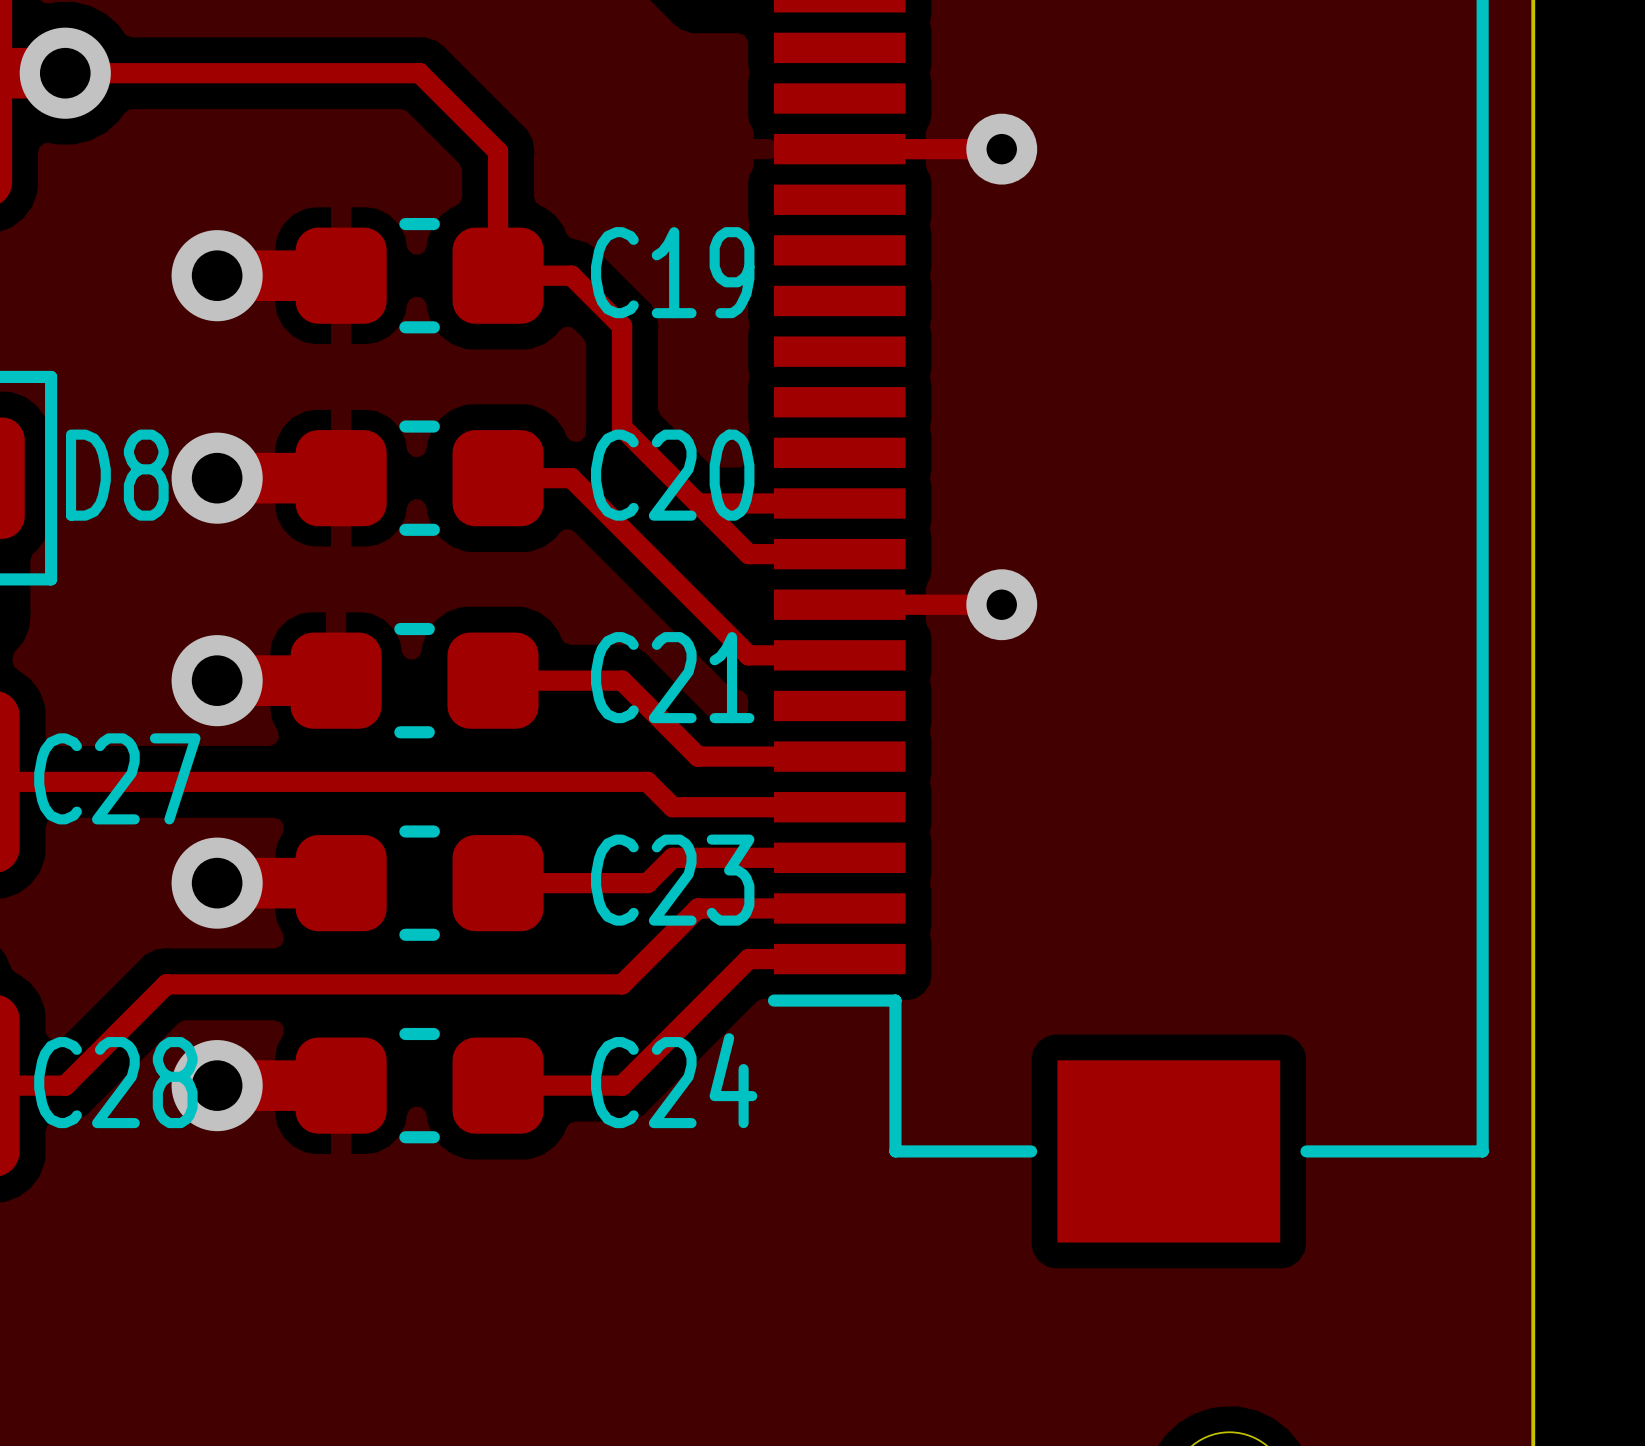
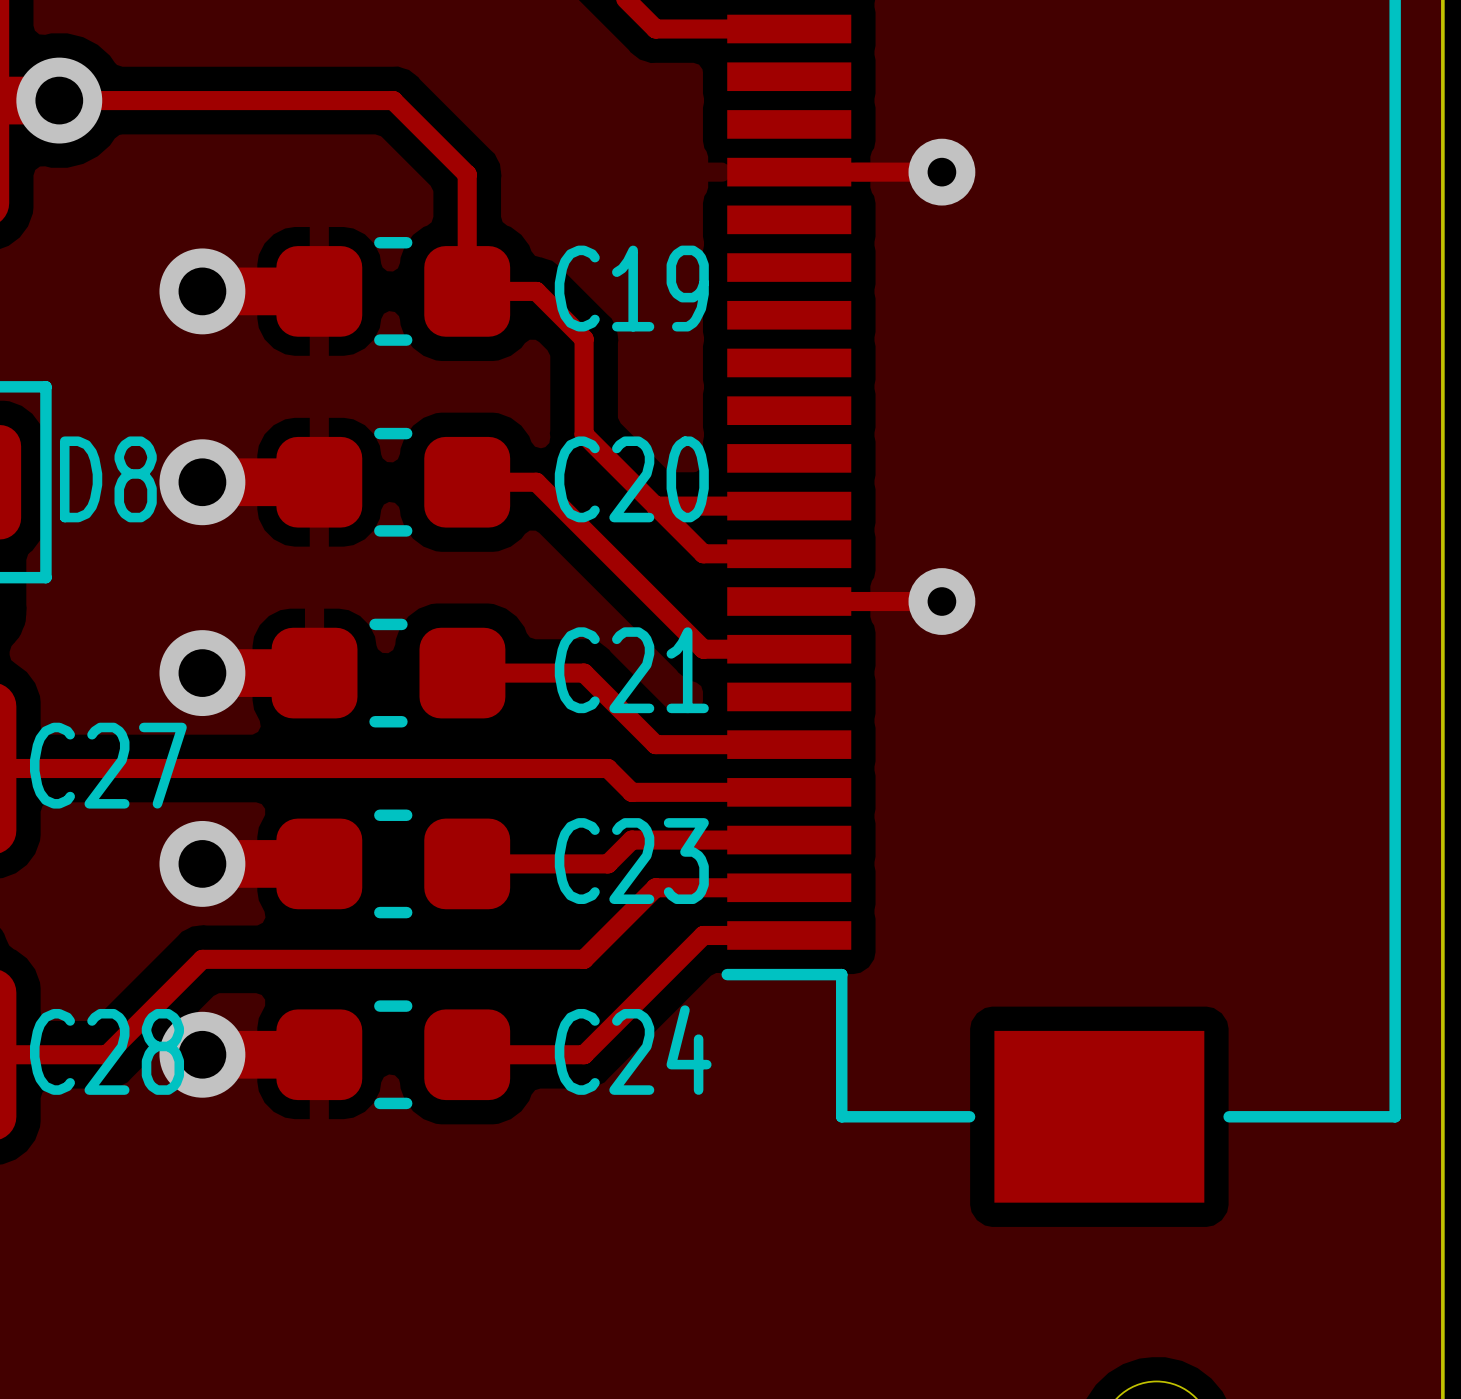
track: (217, 984) (166, 984) (65, 1085) -> (202, 959) (107, 1054) (59, 1054)

